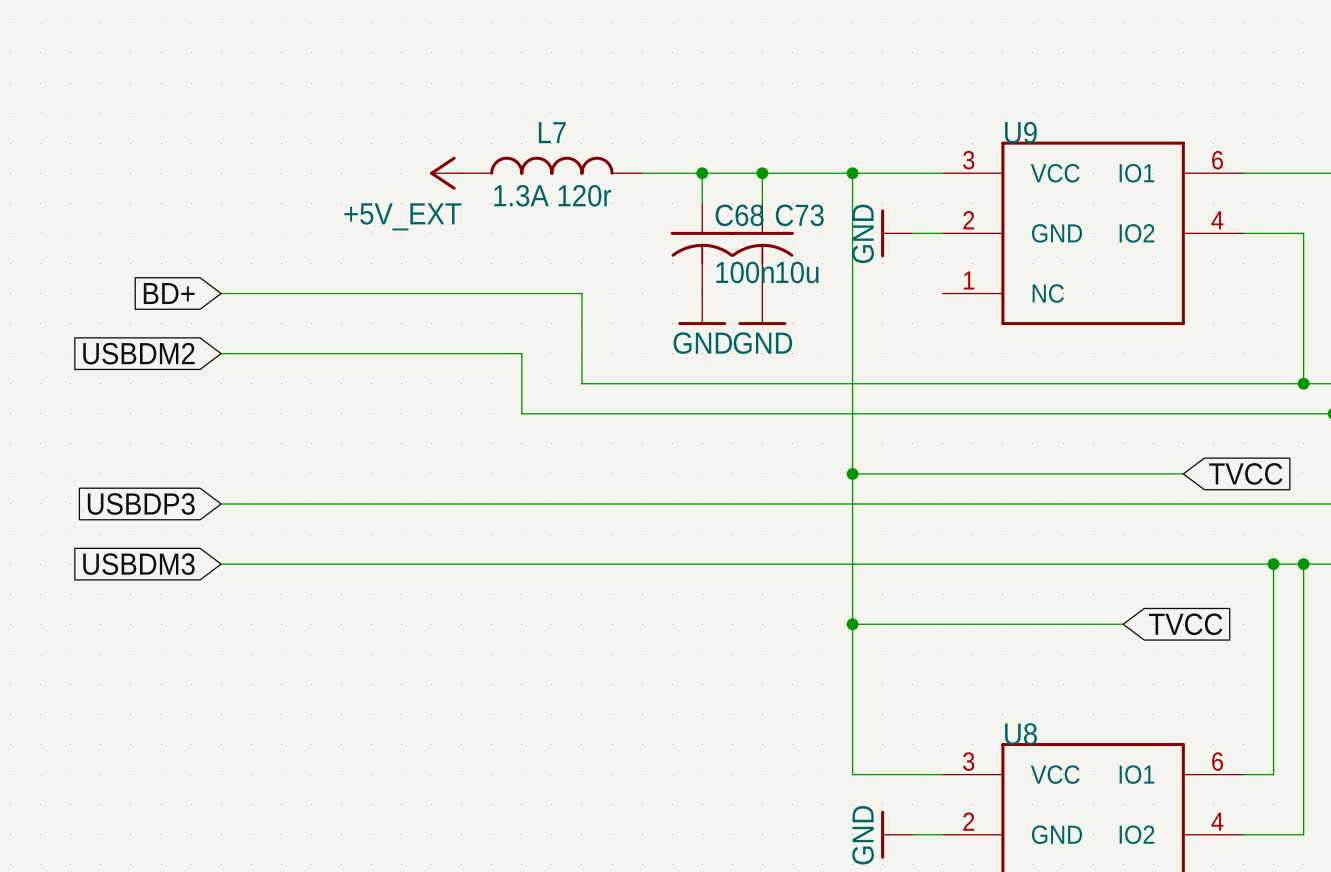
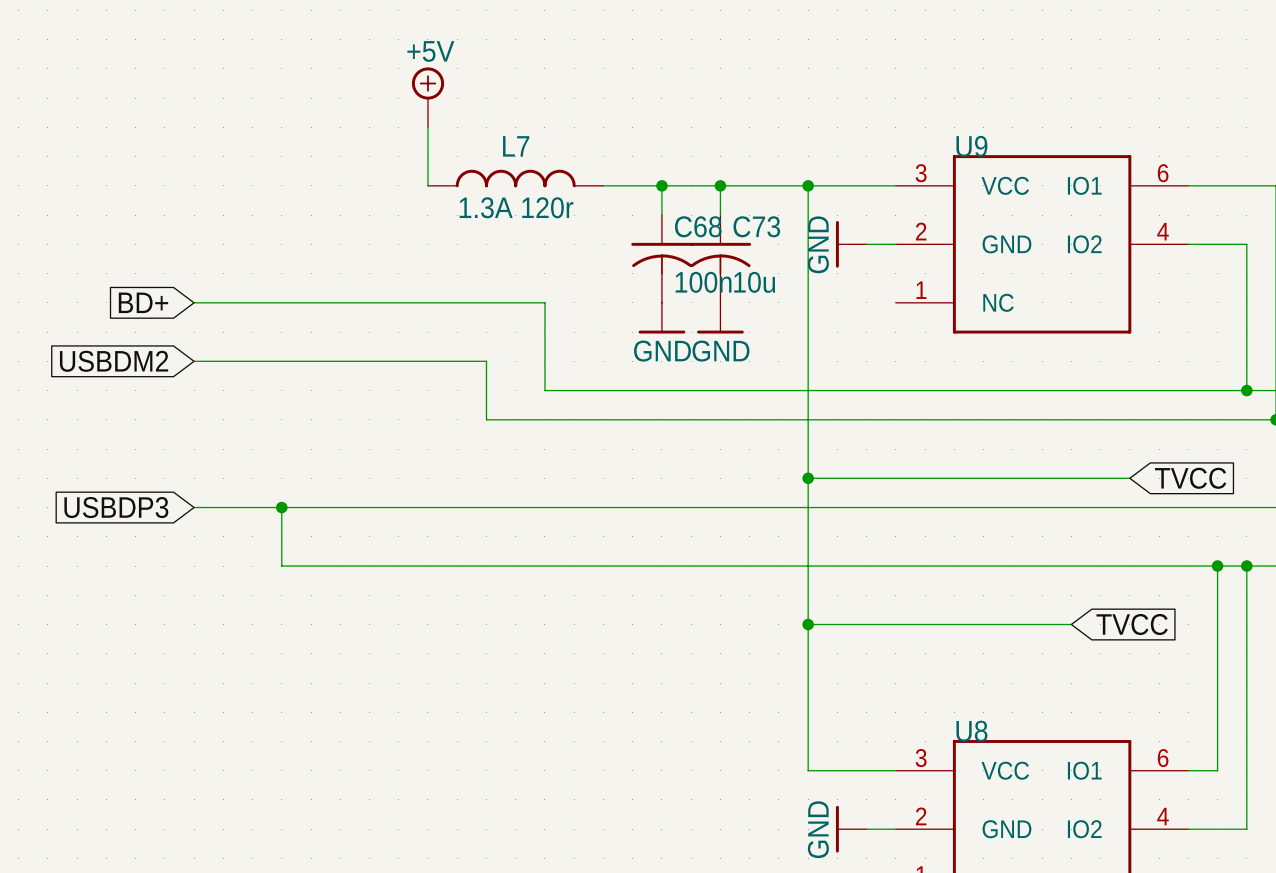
power symbol: none -> +5V (427, 97)
wire: none -> (427, 127) (427, 185)
power symbol: +5V_EXT (445, 173) -> none
junction: none -> (281, 507)
global label: USBDM3 (138, 564) -> none
wire: (221, 564) (311, 564) -> (281, 507) (281, 566)

